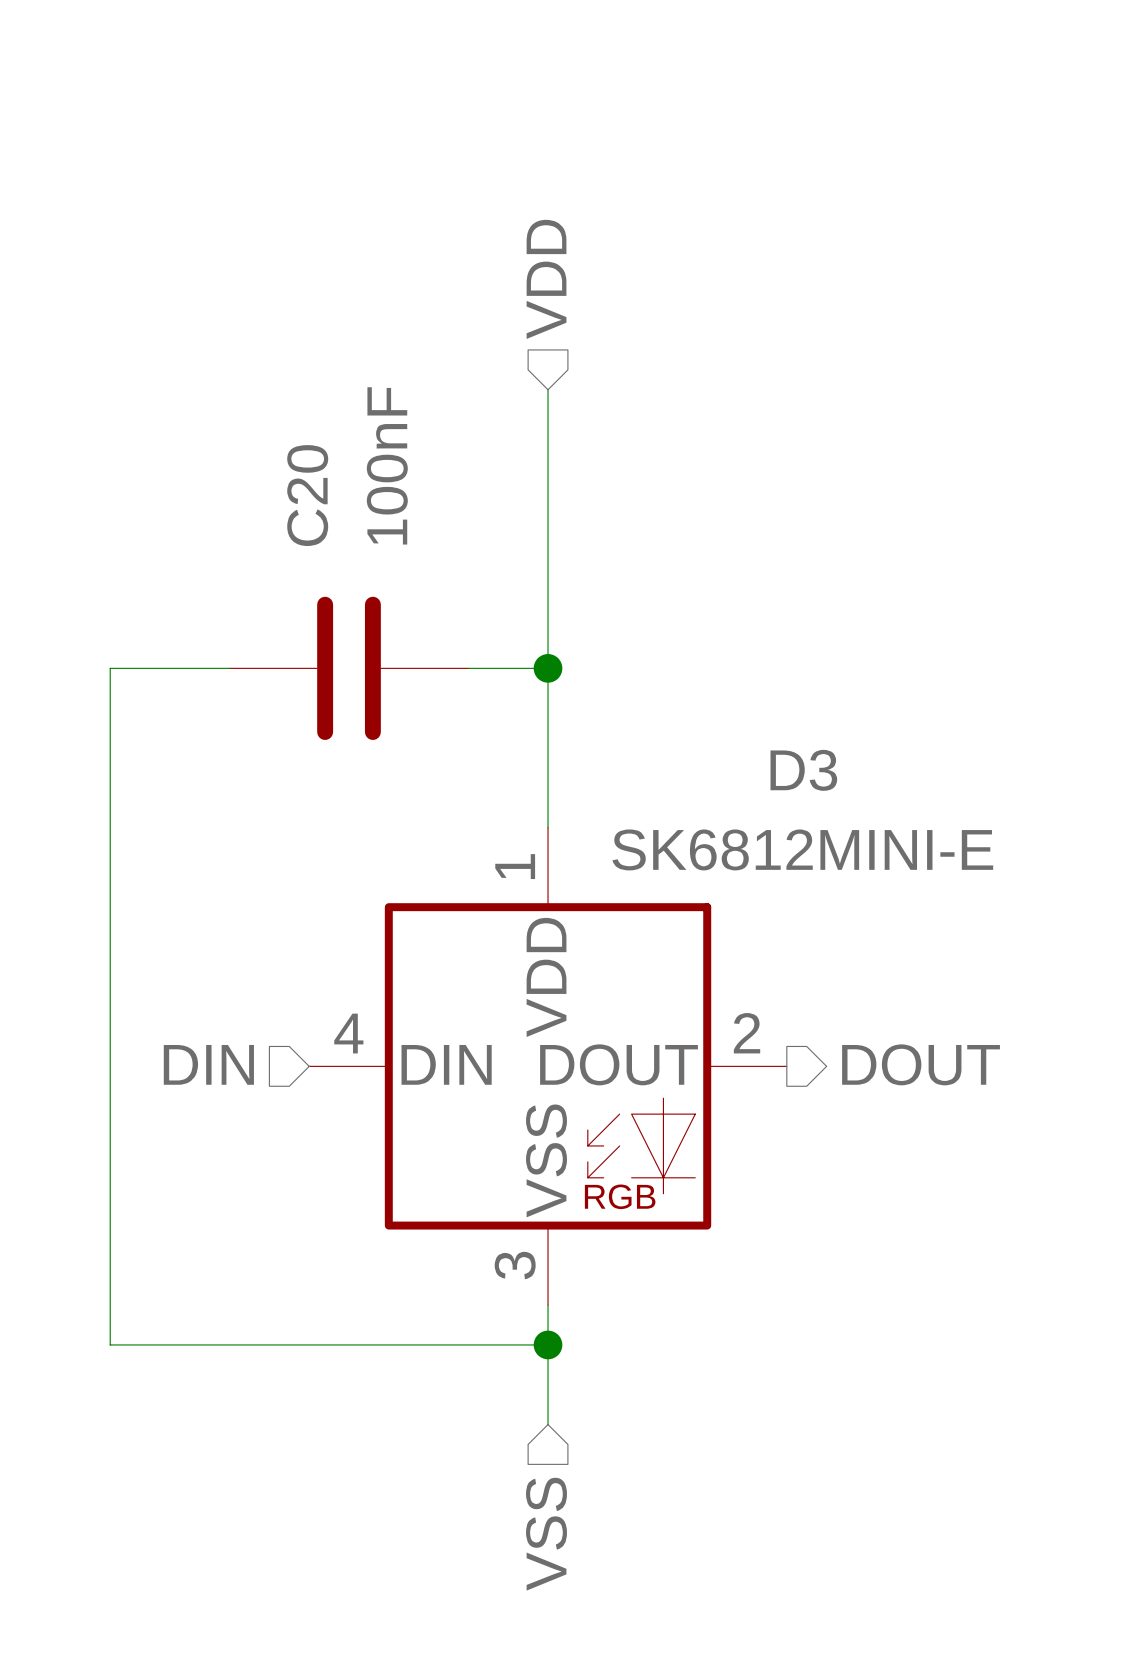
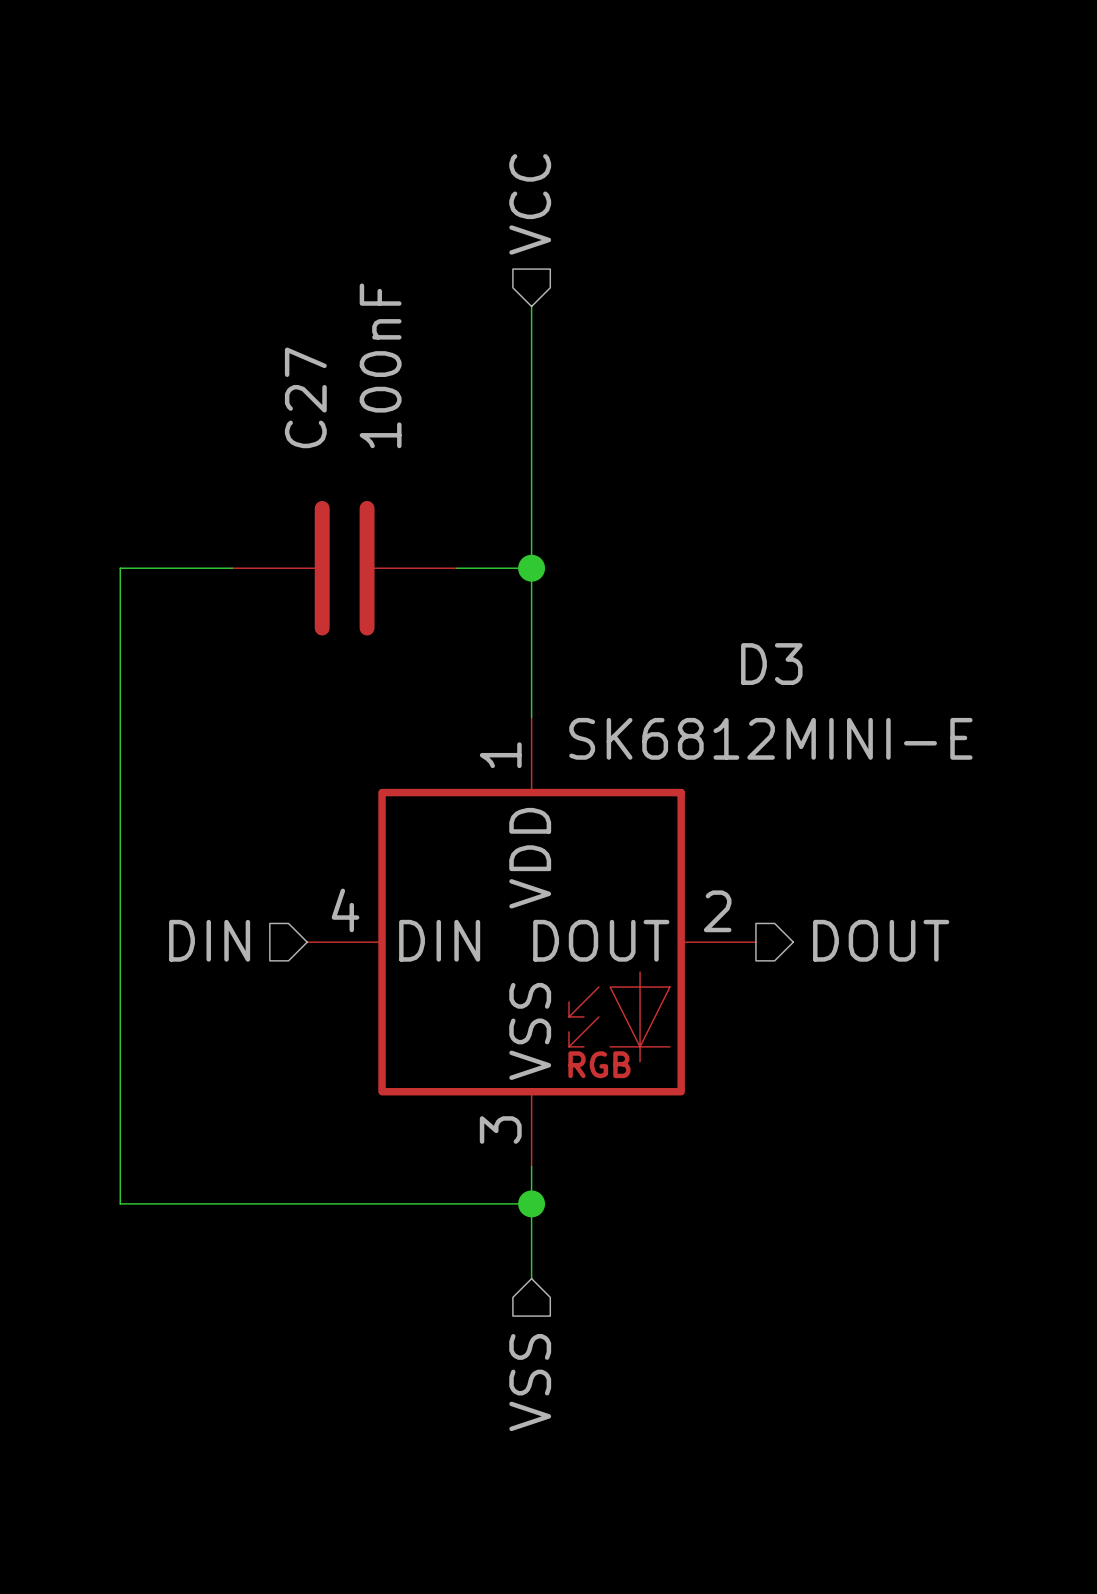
hierarchical label: VDD (546, 279) -> VCC (530, 204)
C20 name: C20 (307, 495) -> C27 (305, 397)

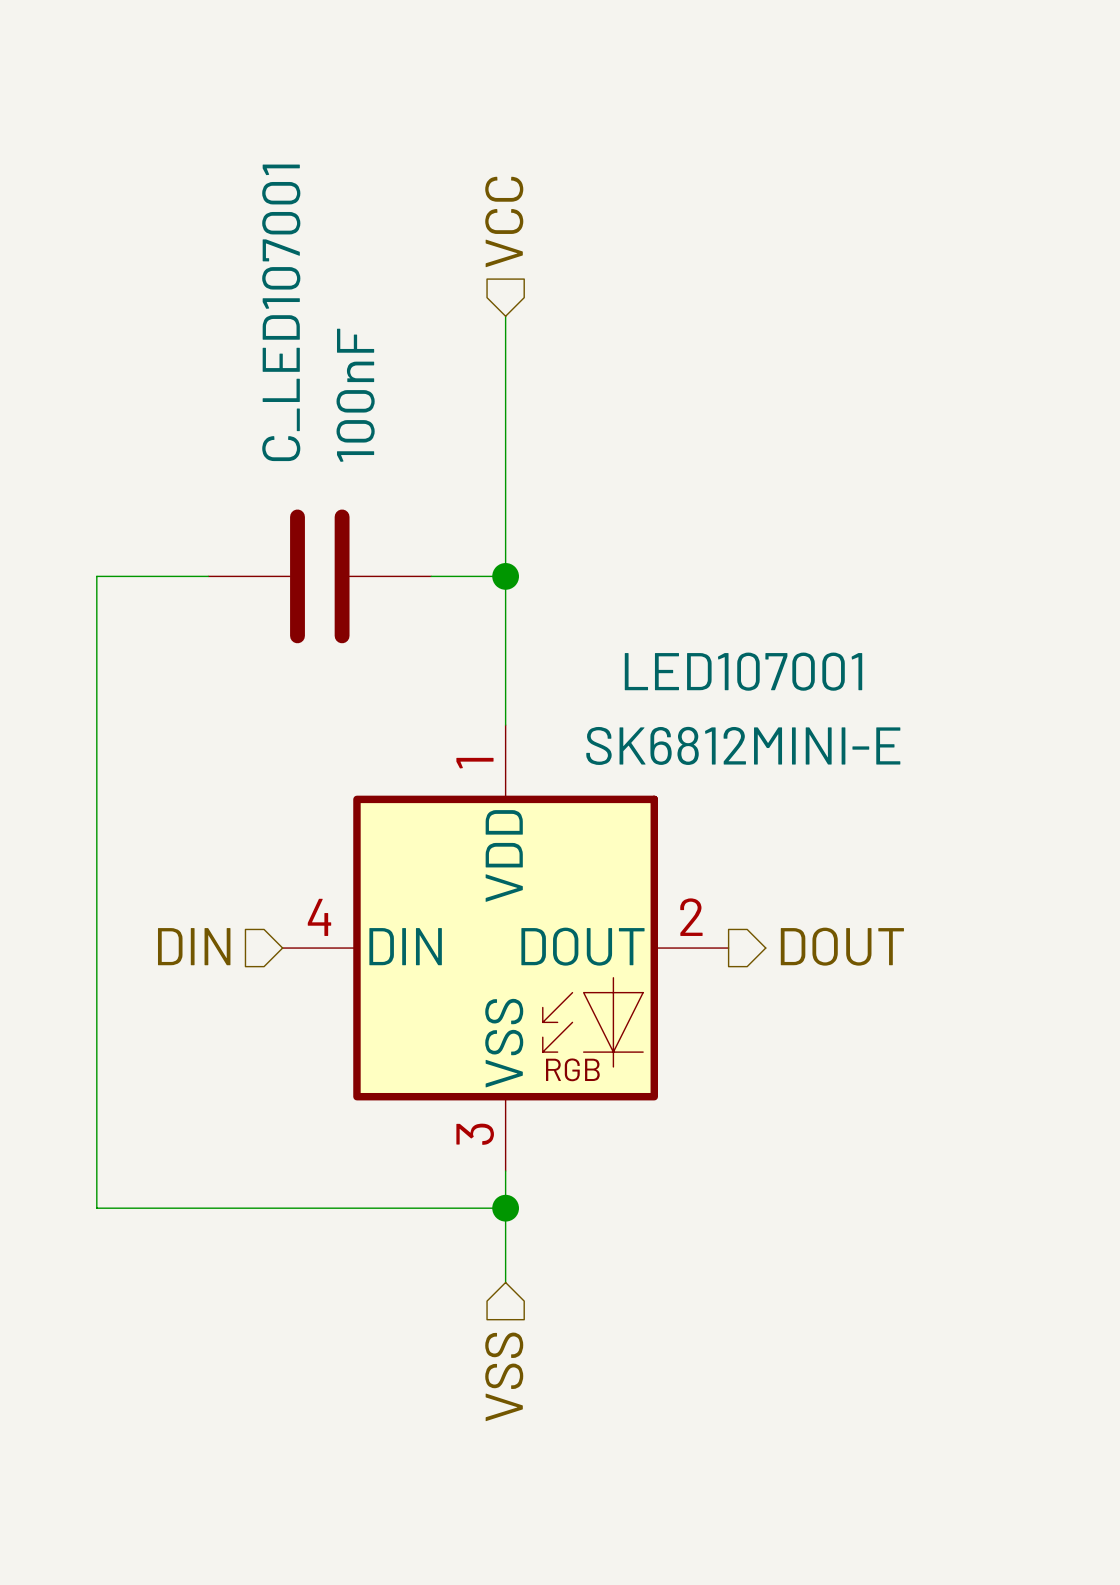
C27 name: C27 (305, 397) -> C_LED107001 (281, 312)
D3 name: D3 (771, 664) -> LED107001 (743, 671)

